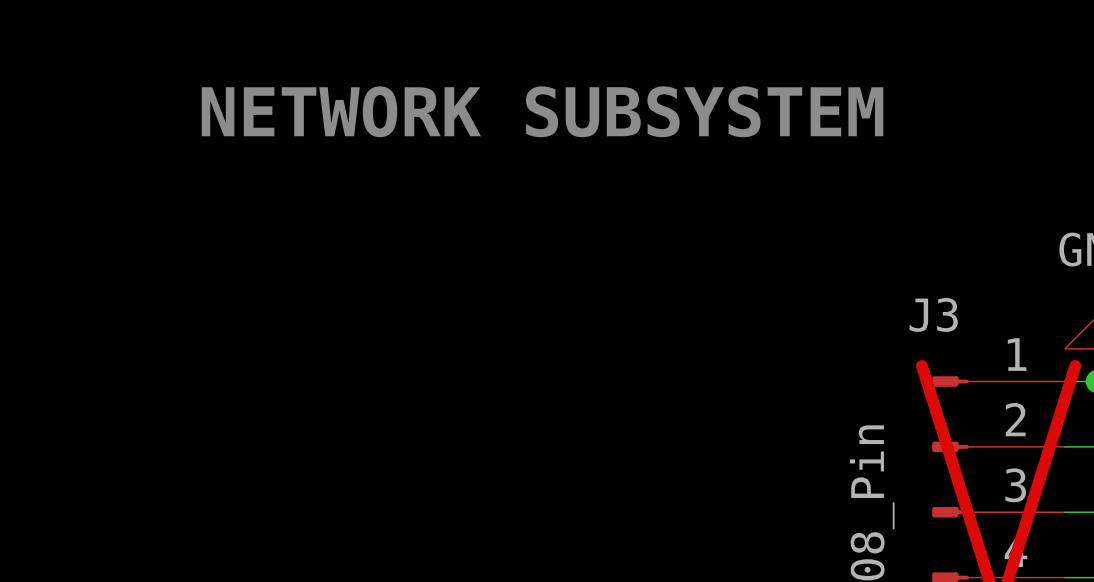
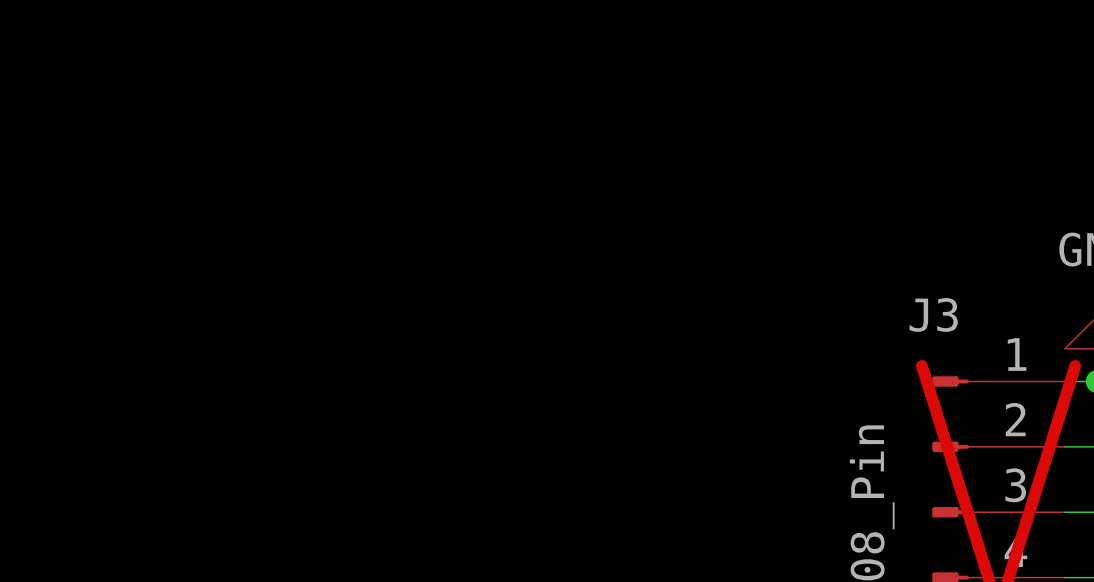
text: NETWORK SUBSYSTEM (542, 111) -> none

